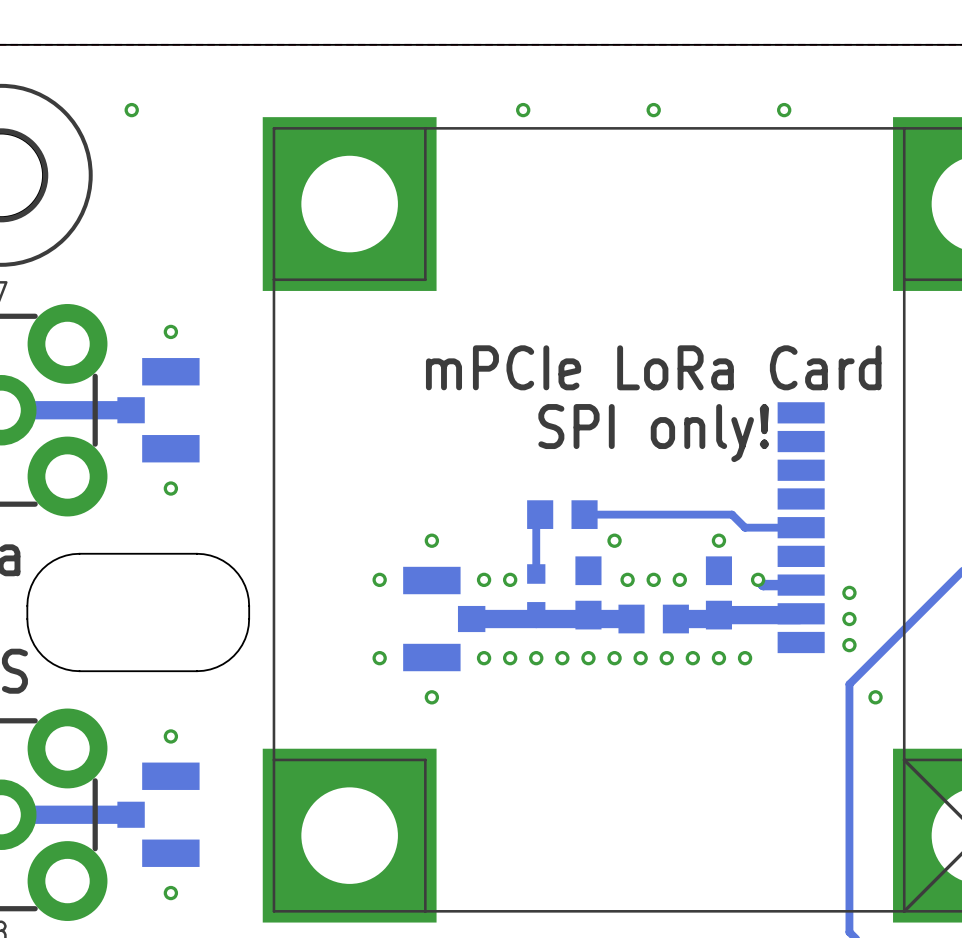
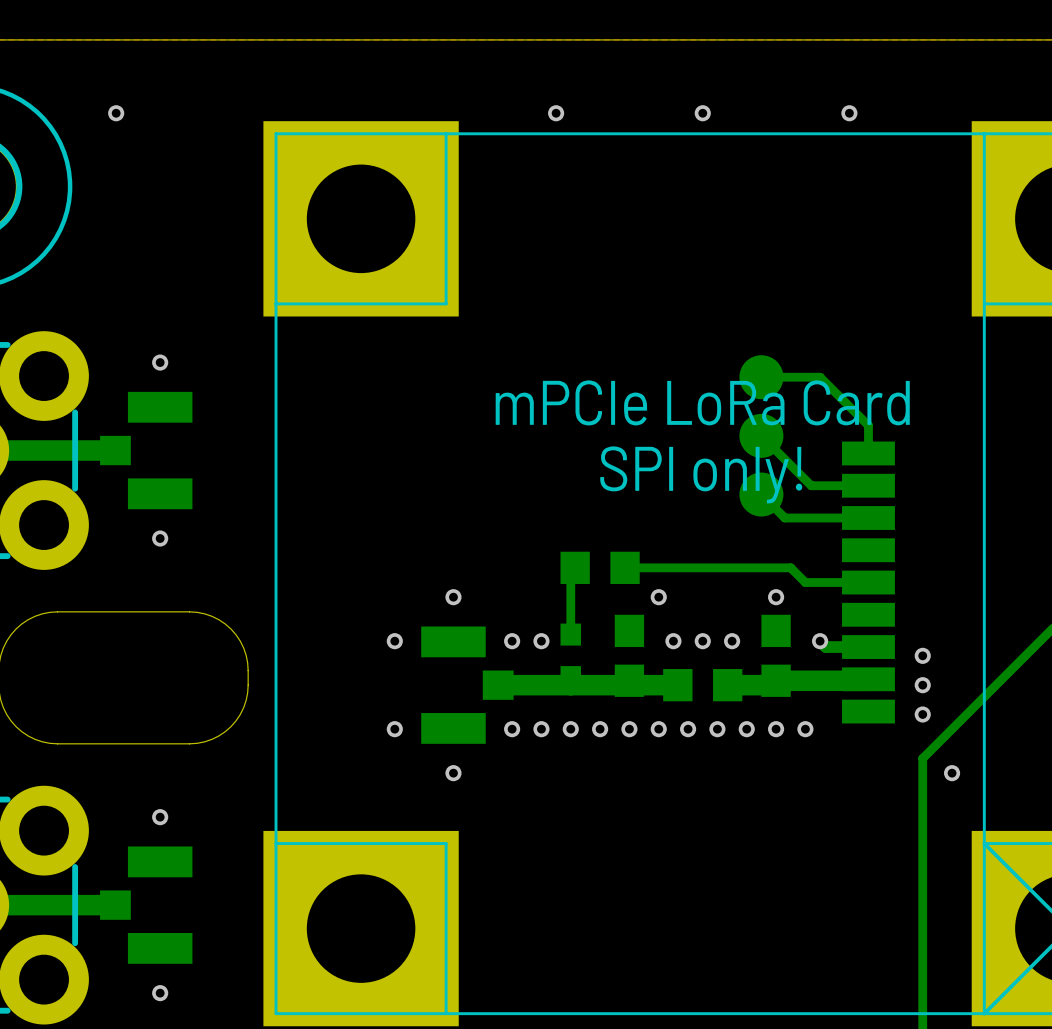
bottom track: none -> (761, 377) (820, 377) (868, 425) (868, 453)
part: none -> (761, 377)
bottom track: none -> (761, 435) (811, 485) (868, 485)
part: none -> (761, 435)
bottom track: none -> (761, 494) (784, 517) (868, 517)
part: none -> (761, 494)

